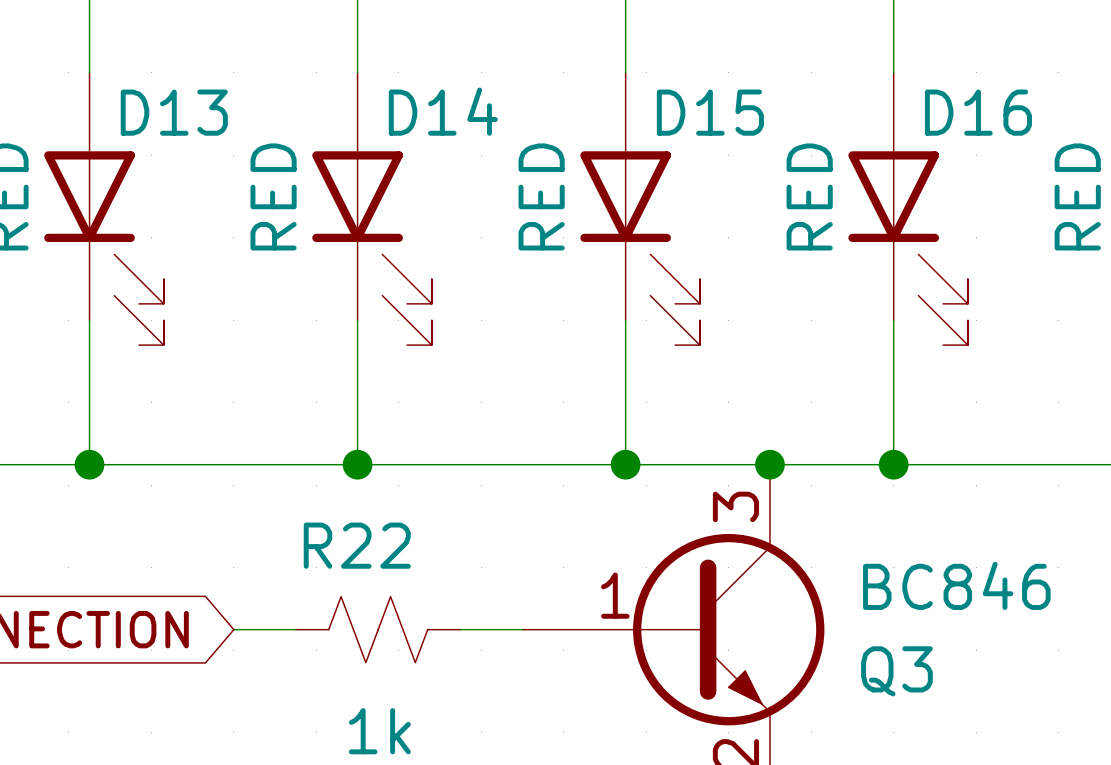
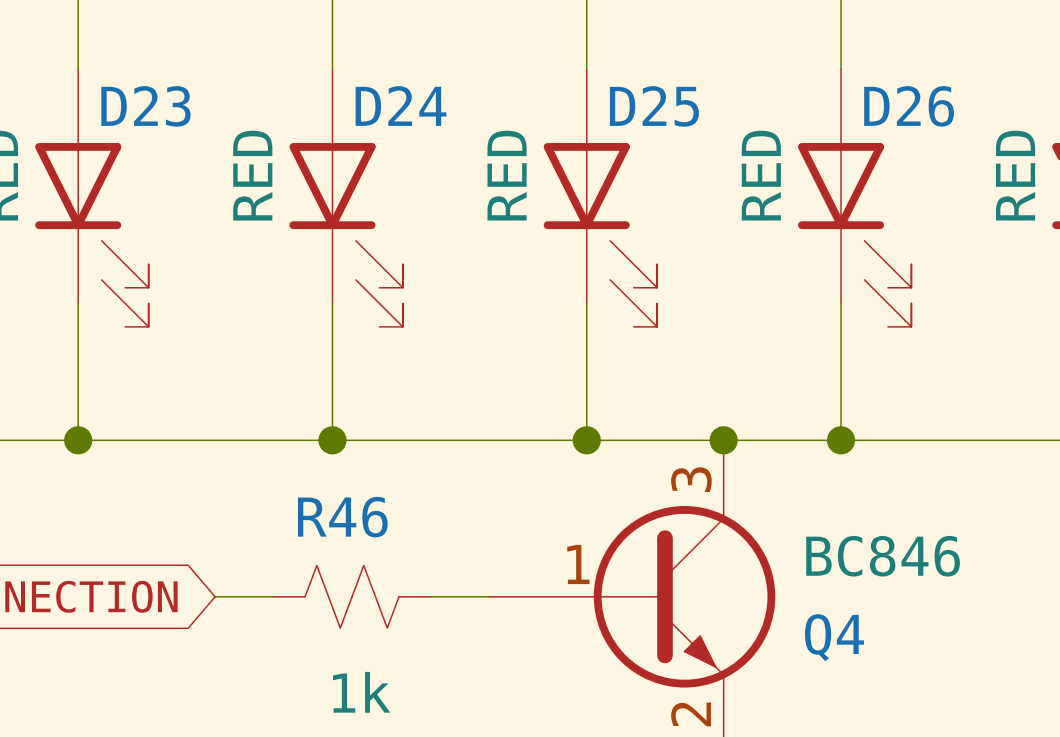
D14 name: D14 (443, 111) -> D24 (401, 106)
D13 name: D13 (174, 112) -> D23 (146, 106)
D15 name: D15 (710, 112) -> D25 (654, 106)
D16 name: D16 (978, 112) -> D26 (909, 106)
R22 name: R22 (357, 545) -> R46 (342, 517)
Q3 name: Q3 (896, 671) -> Q4 (834, 637)

